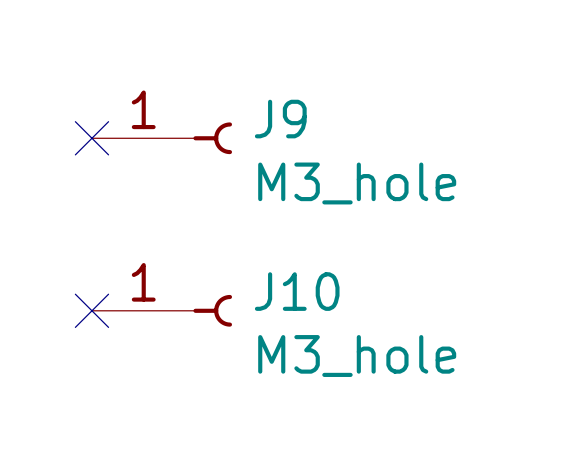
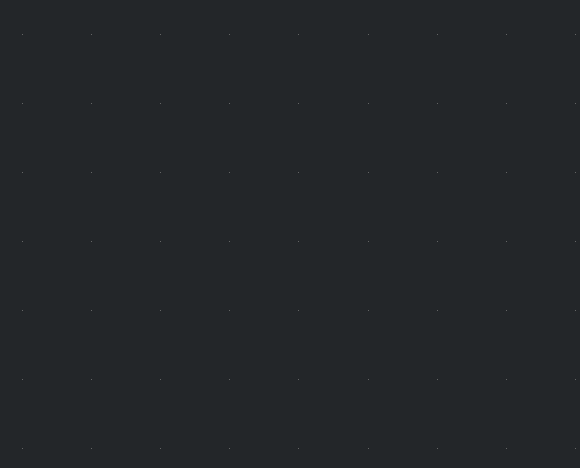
no-connect mark: (91, 138) -> none
J9: M3_hole (162, 138) -> none
no-connect mark: (91, 310) -> none
J10: M3_hole (162, 310) -> none

